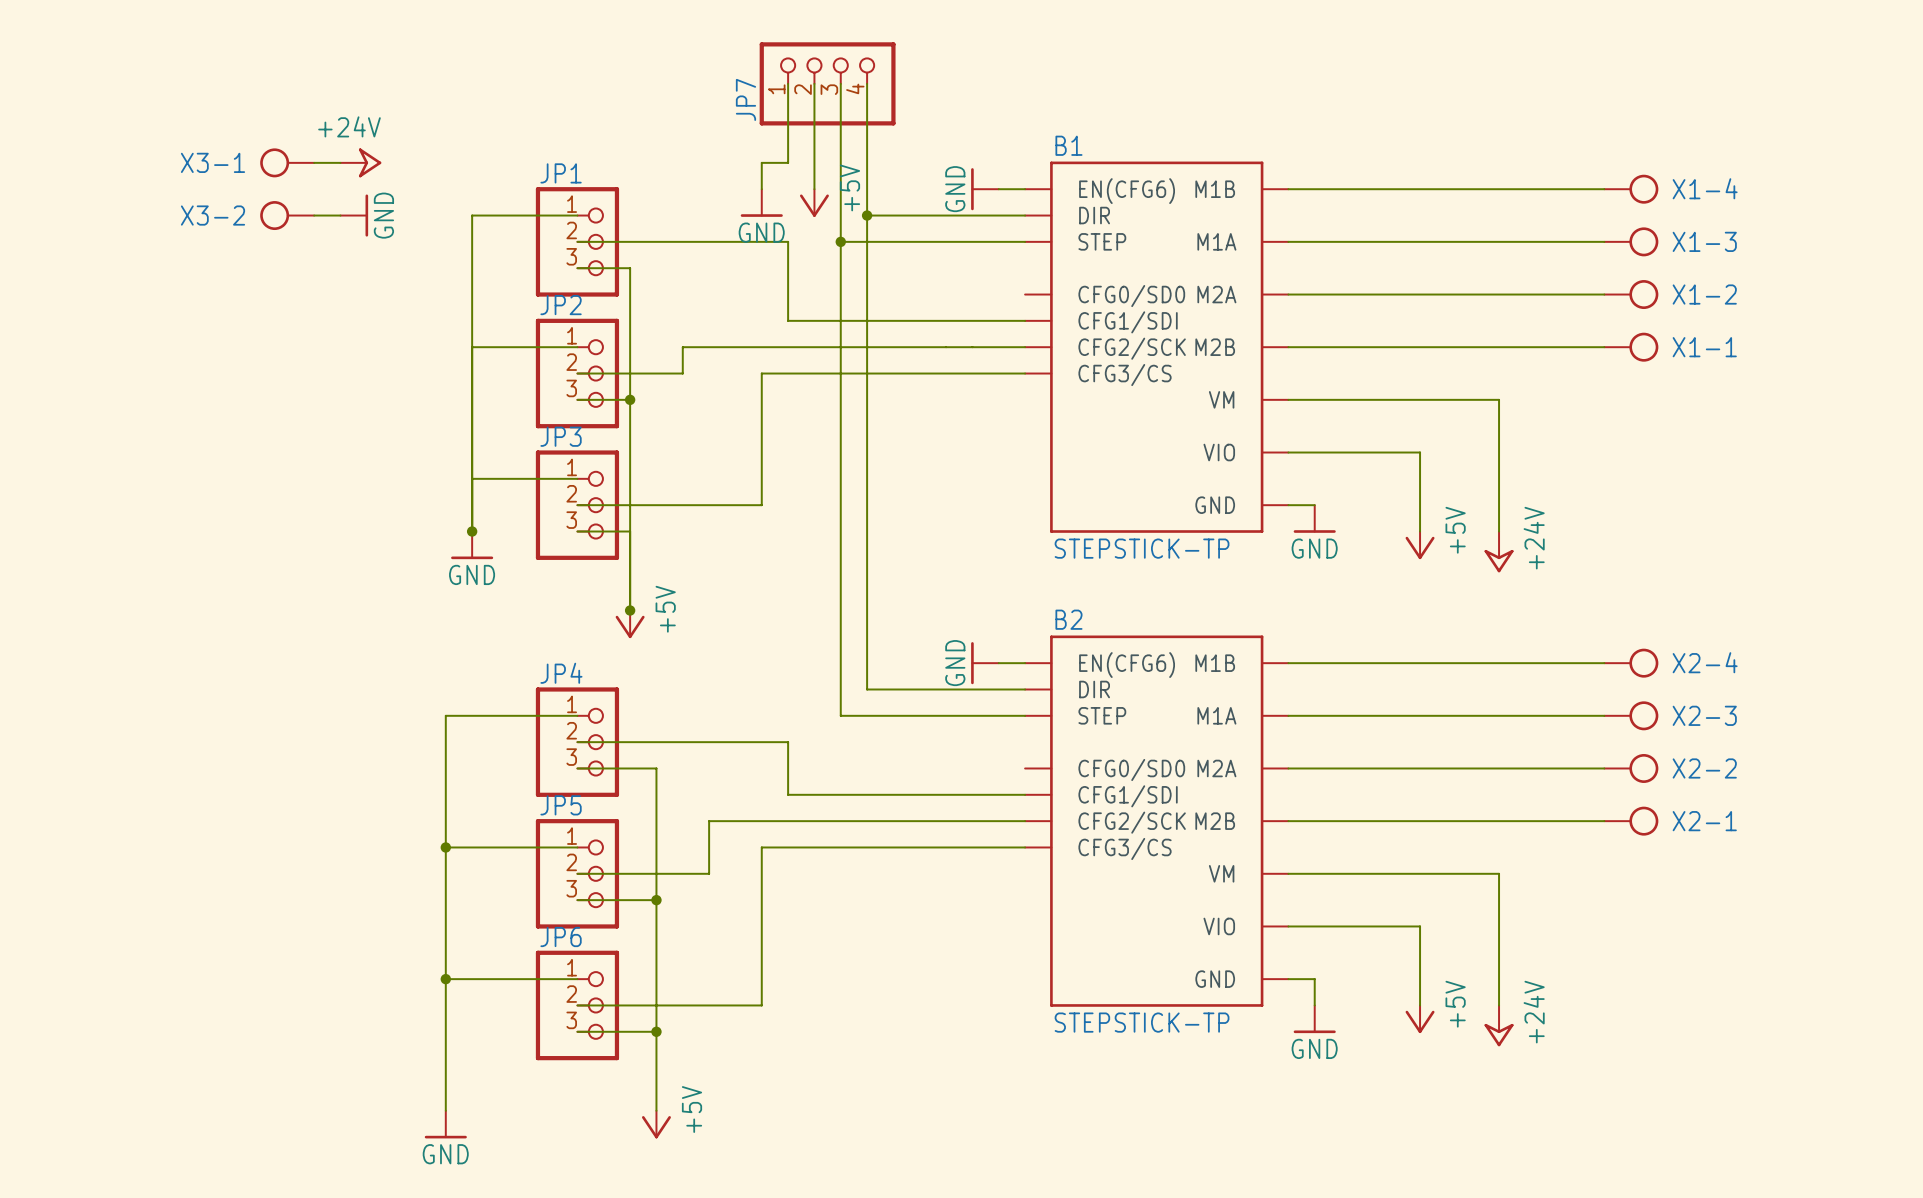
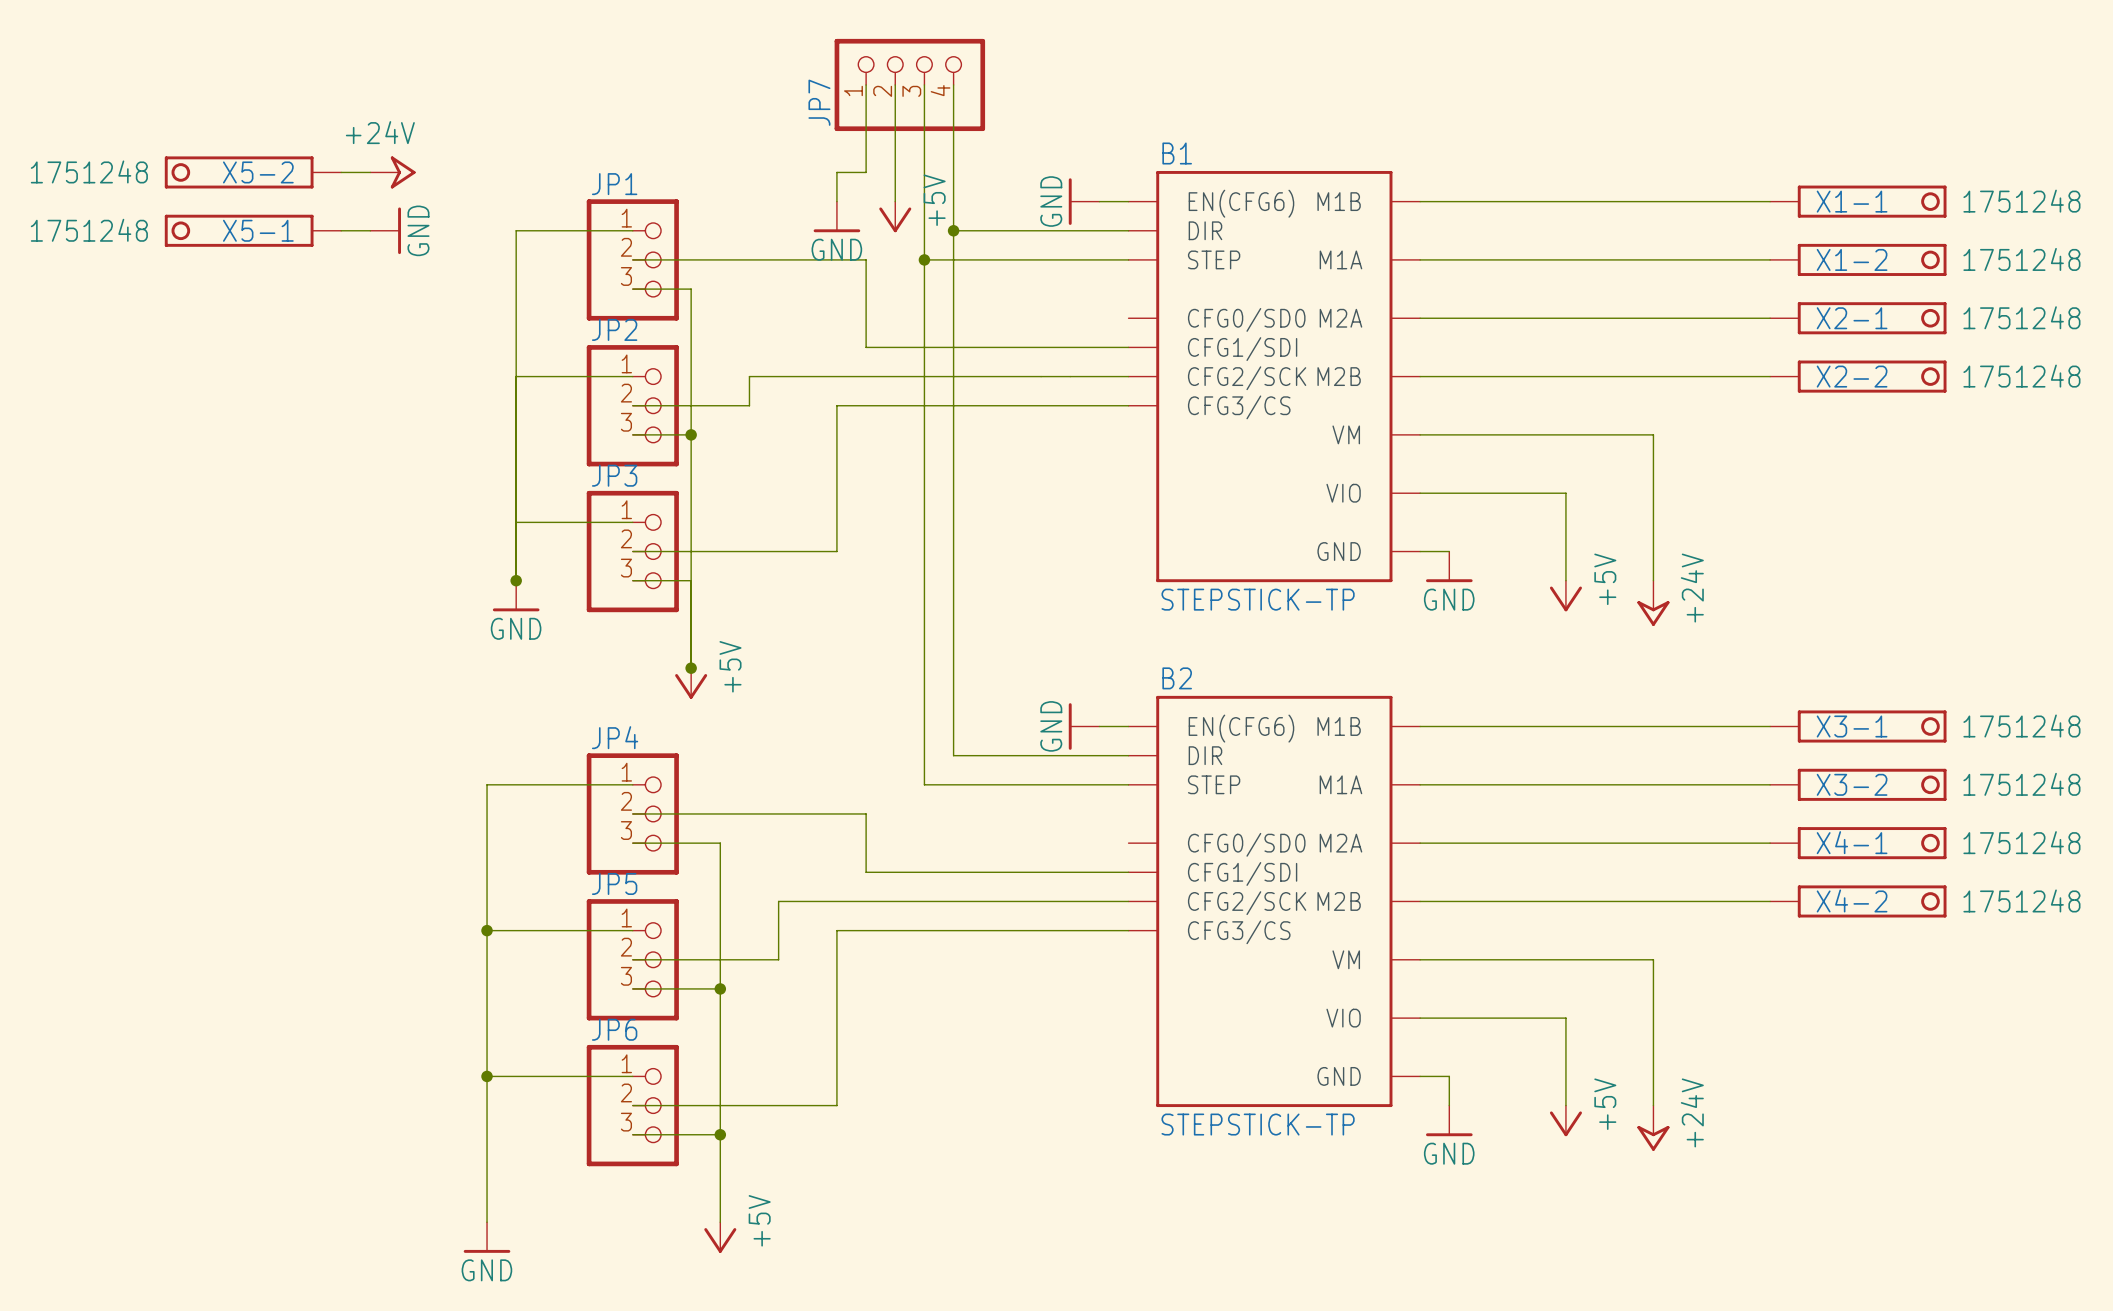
X3-1 symbol: [260, 148, 315, 178] -> [1770, 710, 1947, 743]
X3-1 name position: X3-1 (212, 162) -> X3-1 (1852, 726)
X5-2: none -> 1751248 (253, 172)
X1-1 value: none -> 1751248 (2021, 201)
X1-4: (1631, 189) -> none
X3-2 symbol: [260, 201, 315, 231] -> [1770, 768, 1947, 801]
X3-2 name position: X3-2 (212, 215) -> X3-2 (1852, 784)
X5-1: none -> 1751248 (253, 230)
X1-3: (1631, 241) -> none
X1-2 value: none -> 1751248 (2021, 259)
X1-2 symbol: [1604, 280, 1659, 310] -> [1770, 243, 1947, 276]
X1-2 name position: X1-2 (1704, 294) -> X1-2 (1852, 259)
X2-1 value: none -> 1751248 (2021, 317)
X1-1 symbol: [1604, 332, 1659, 362] -> [1770, 185, 1947, 218]
X2-2 value: none -> 1751248 (2021, 376)
X1-1 name position: X1-1 (1704, 347) -> X1-1 (1852, 201)
X3-1 value: none -> 1751248 (2021, 726)
X2-4: (1631, 663) -> none
X2-3: (1631, 715) -> none
X3-2 value: none -> 1751248 (2021, 784)
X2-2 symbol: [1604, 754, 1659, 783] -> [1770, 360, 1947, 393]
X4-1: none -> 1751248 (1858, 843)
X2-2 name position: X2-2 (1704, 768) -> X2-2 (1852, 376)
X2-1 symbol: [1604, 806, 1659, 836] -> [1770, 302, 1947, 335]
X4-2: none -> 1751248 (1858, 901)
X2-1 name position: X2-1 (1704, 821) -> X2-1 (1852, 318)

